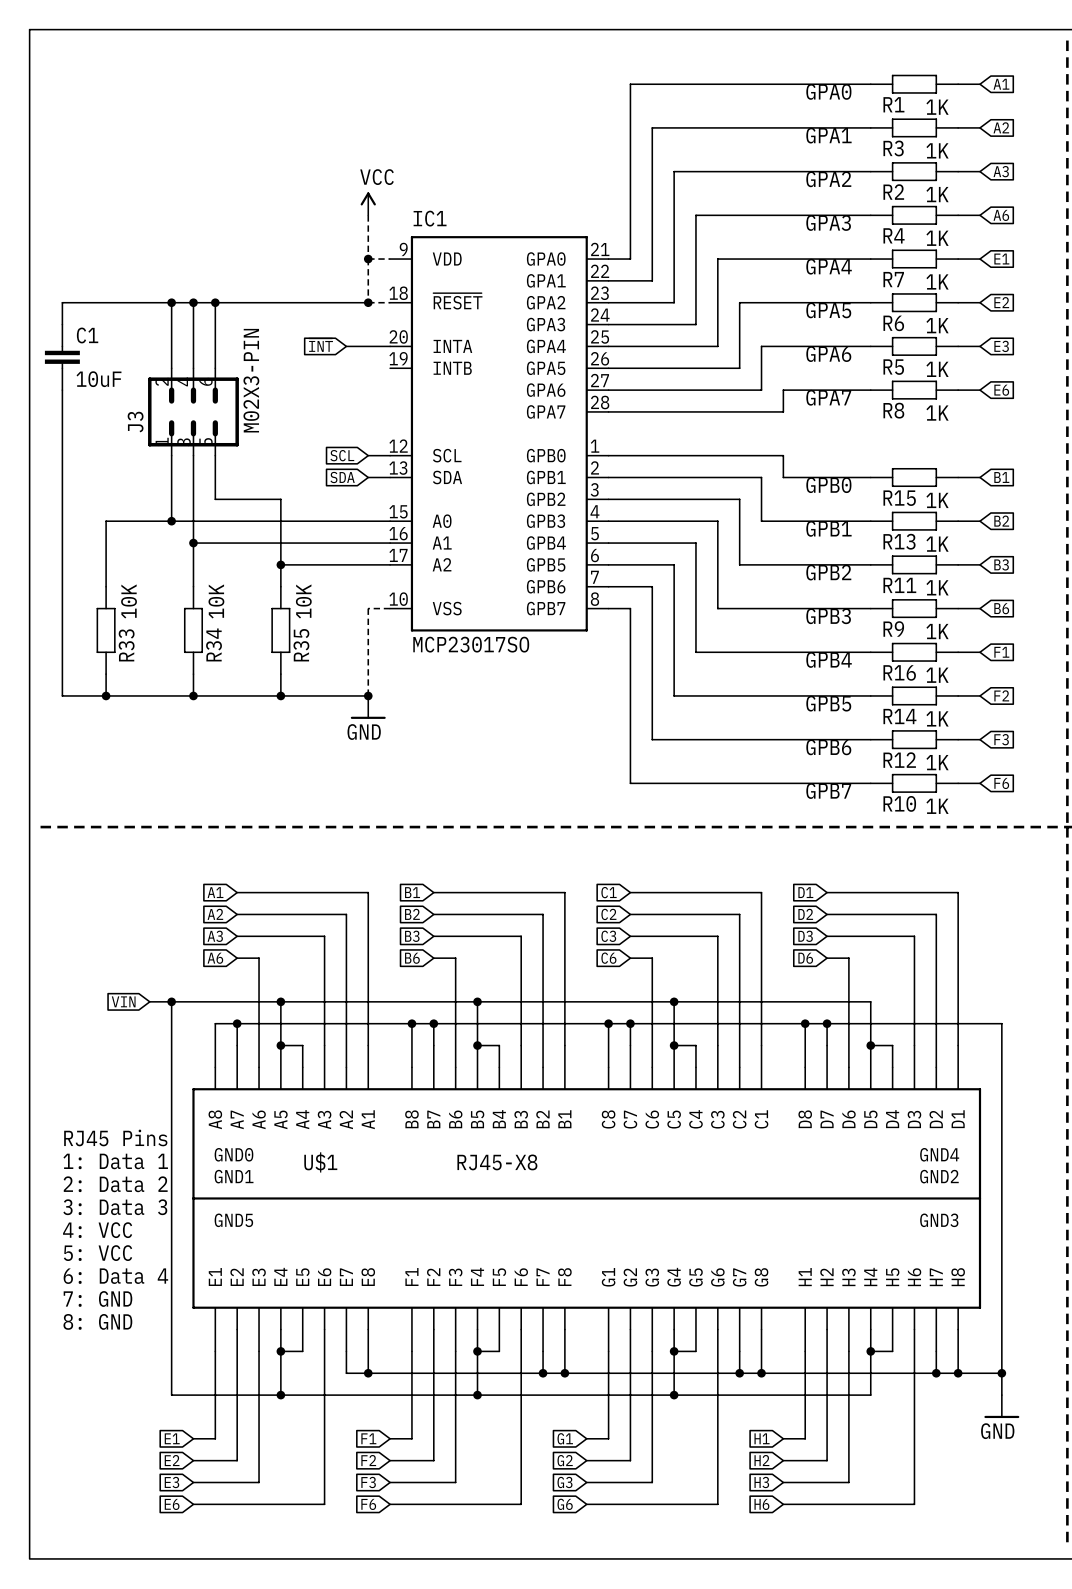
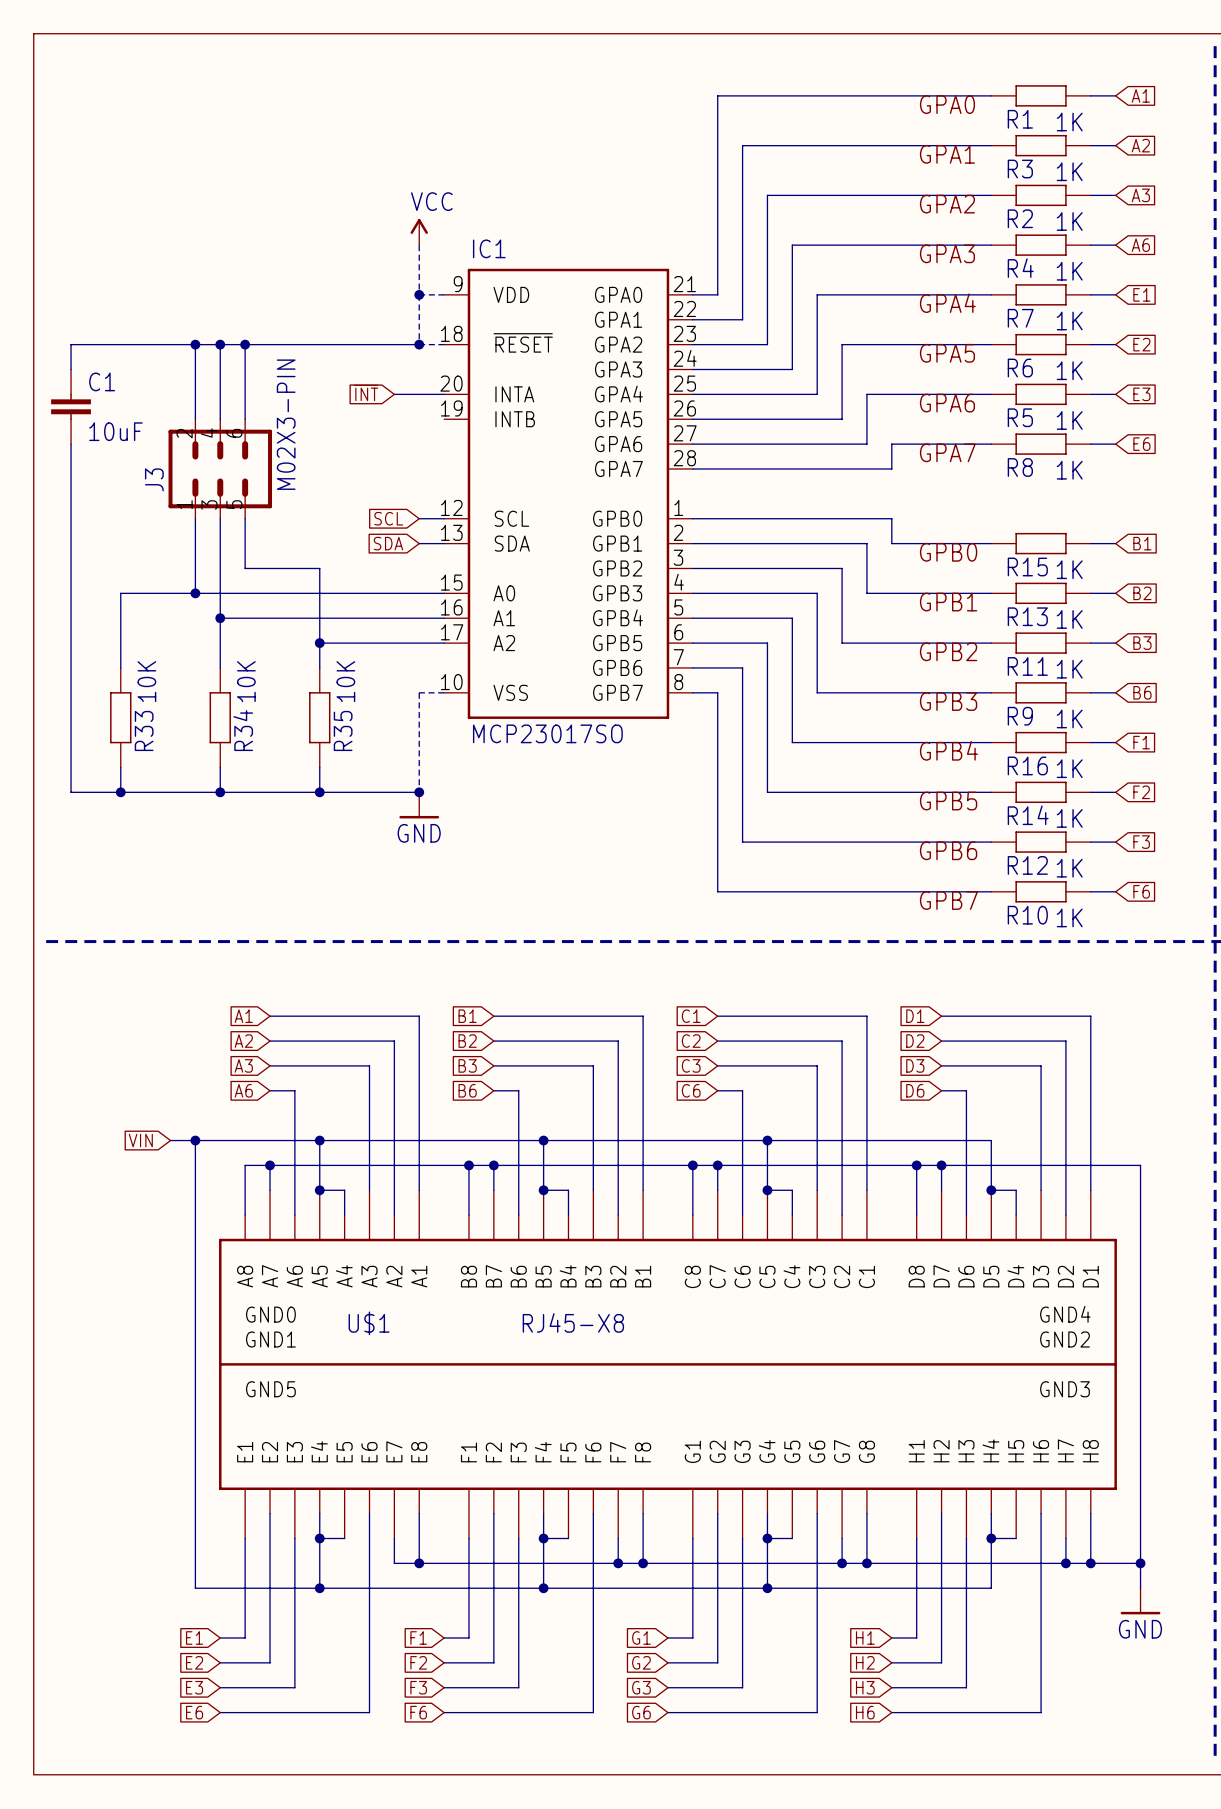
text: RJ45 Pins (115, 1137) -> none
text: 1: Data 1 (115, 1161) -> none
text: 2: Data 2 (115, 1184) -> none
text: 3: Data 3 (115, 1207) -> none
text: 4: VCC (97, 1230) -> none
text: 5: VCC (98, 1253) -> none
text: 6: Data 4 (115, 1276) -> none
text: 7: GND (97, 1298) -> none
text: 8: GND (97, 1321) -> none

